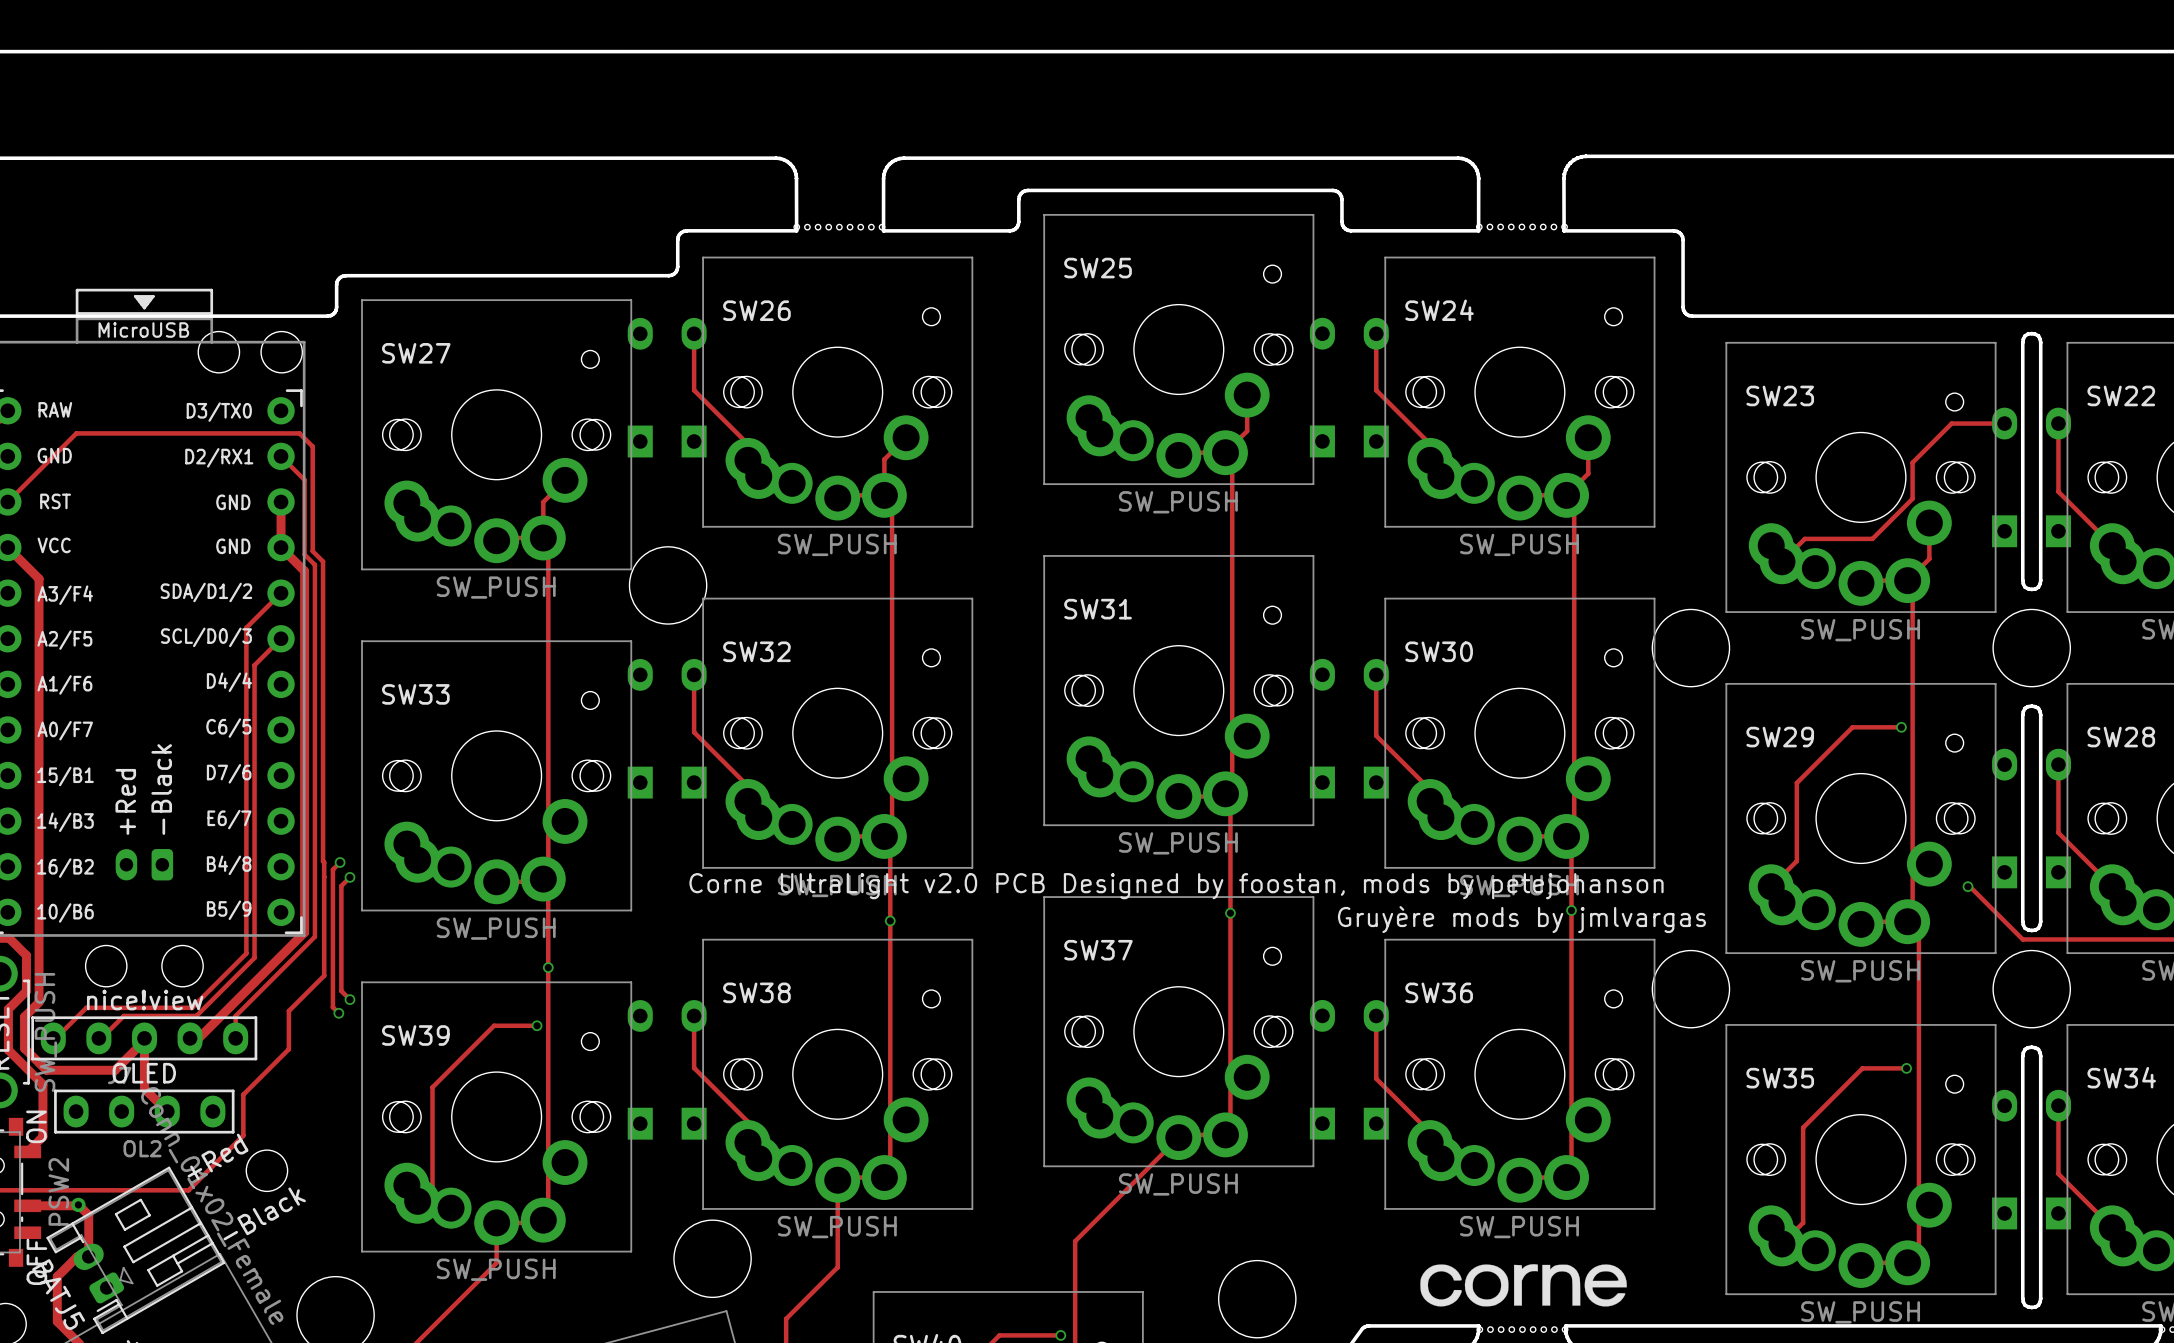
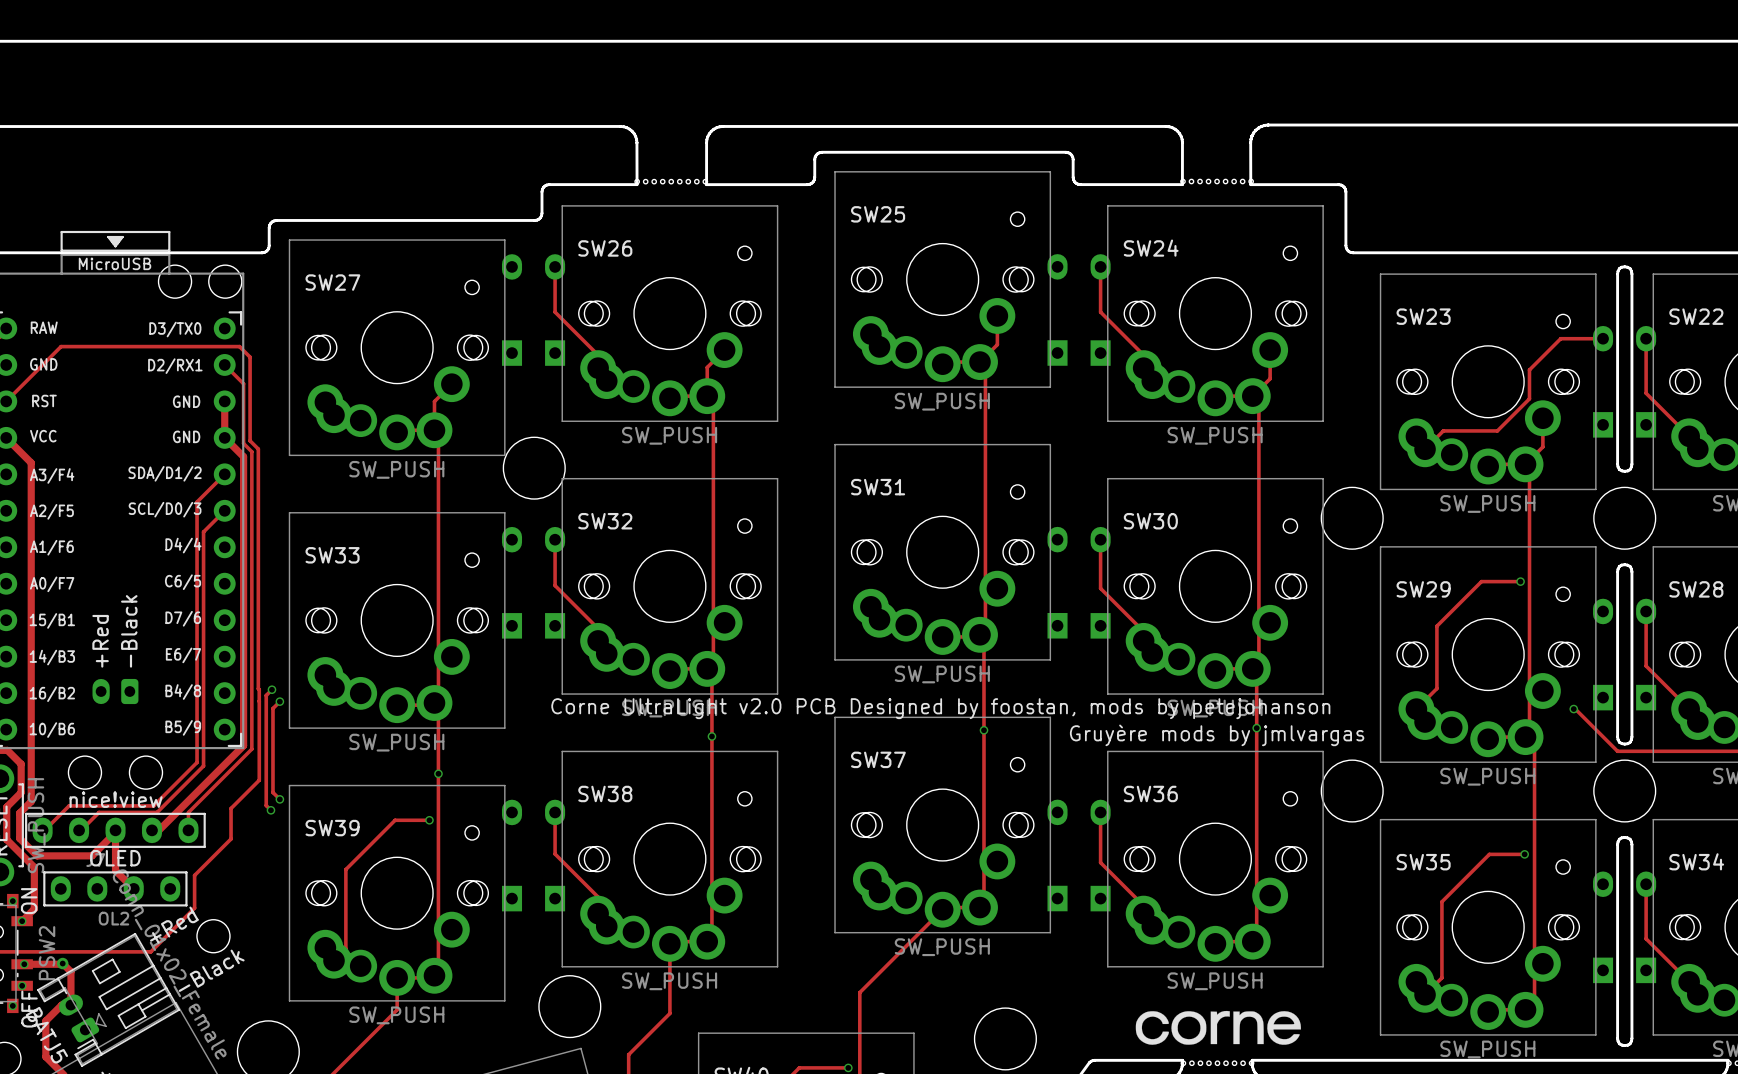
via: none -> (12, 901)
via: none -> (22, 921)
via: none -> (24, 964)
via: none -> (22, 985)
via: none -> (12, 1005)

